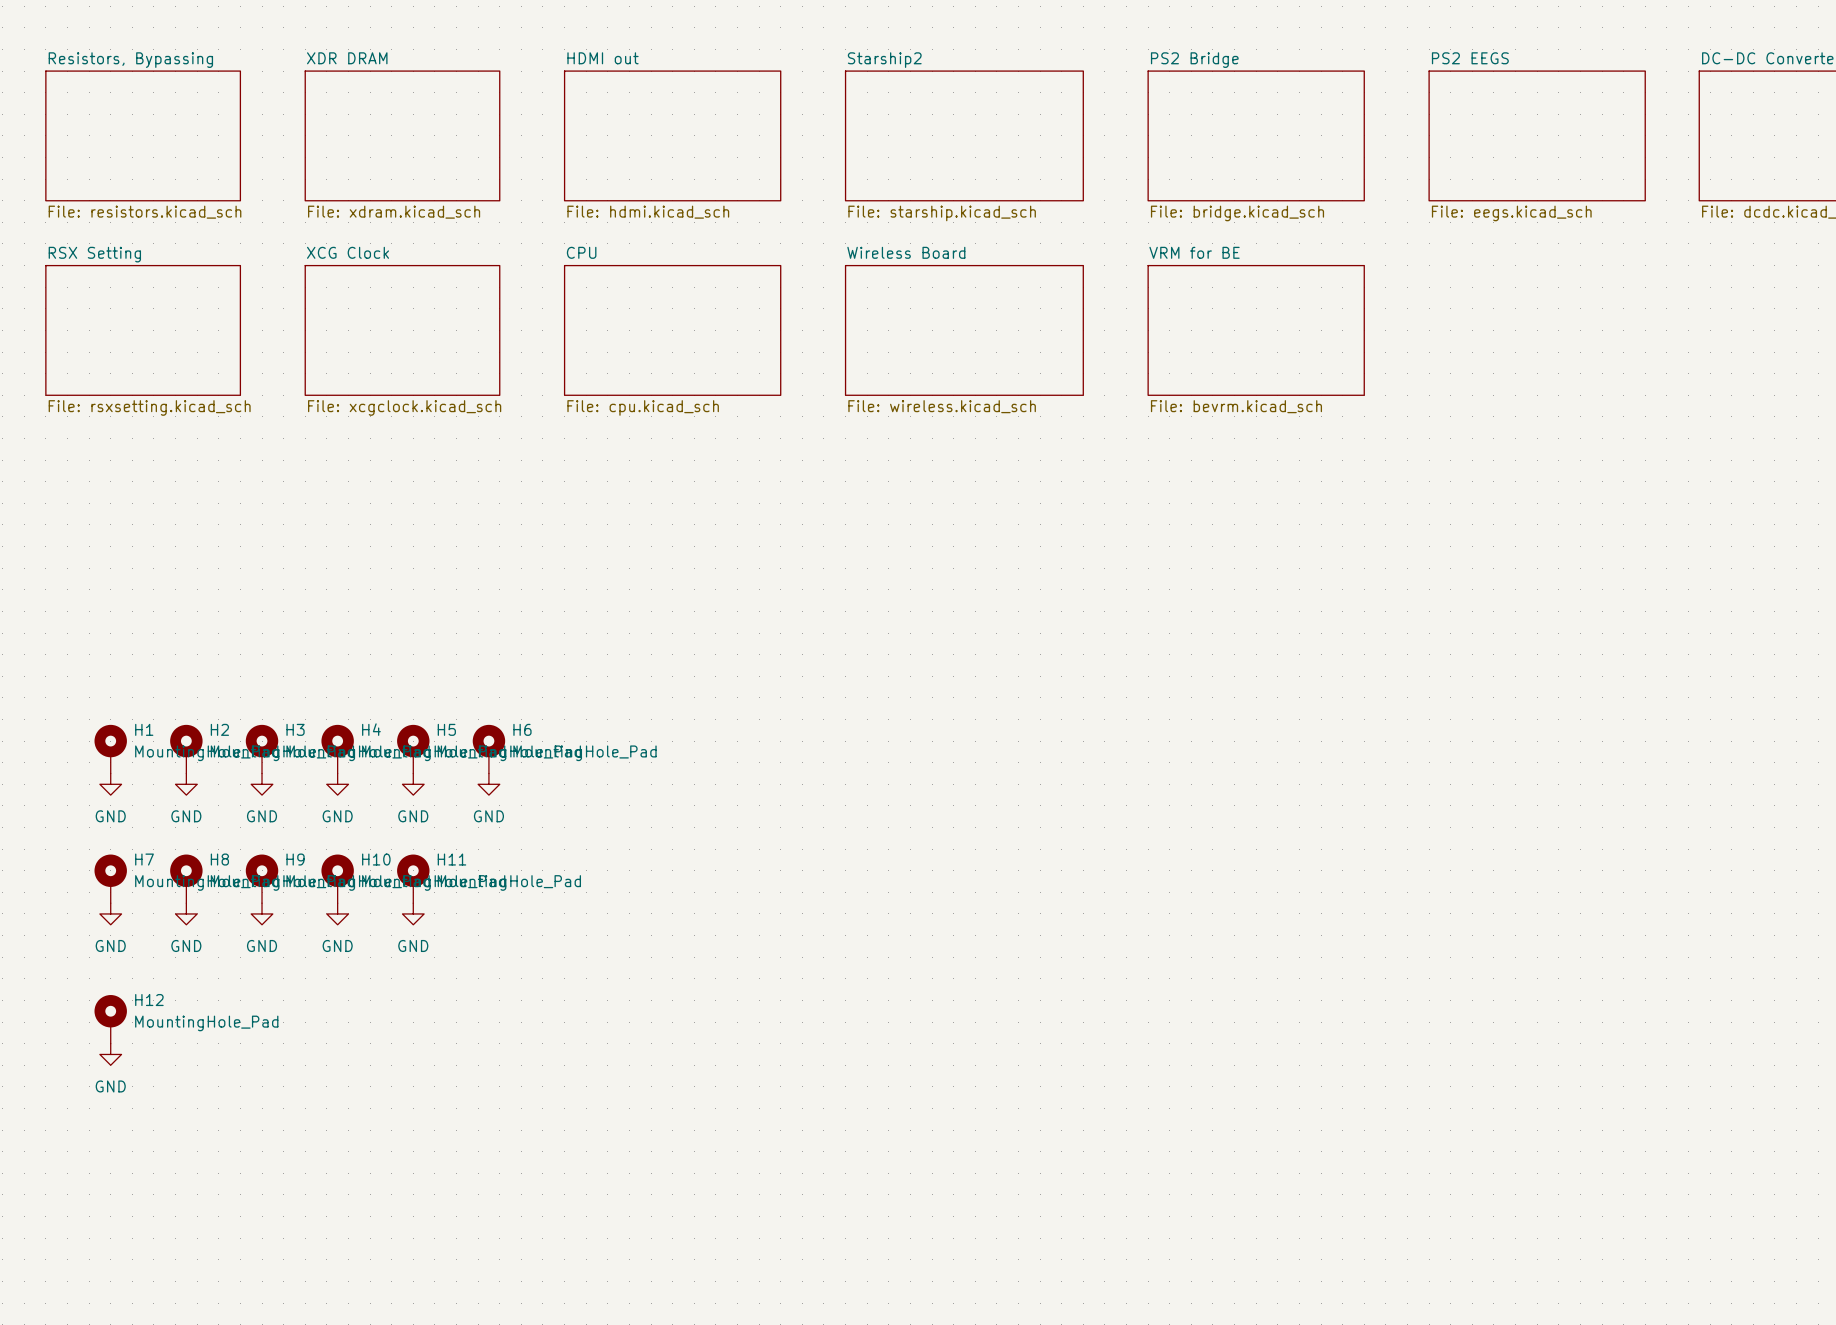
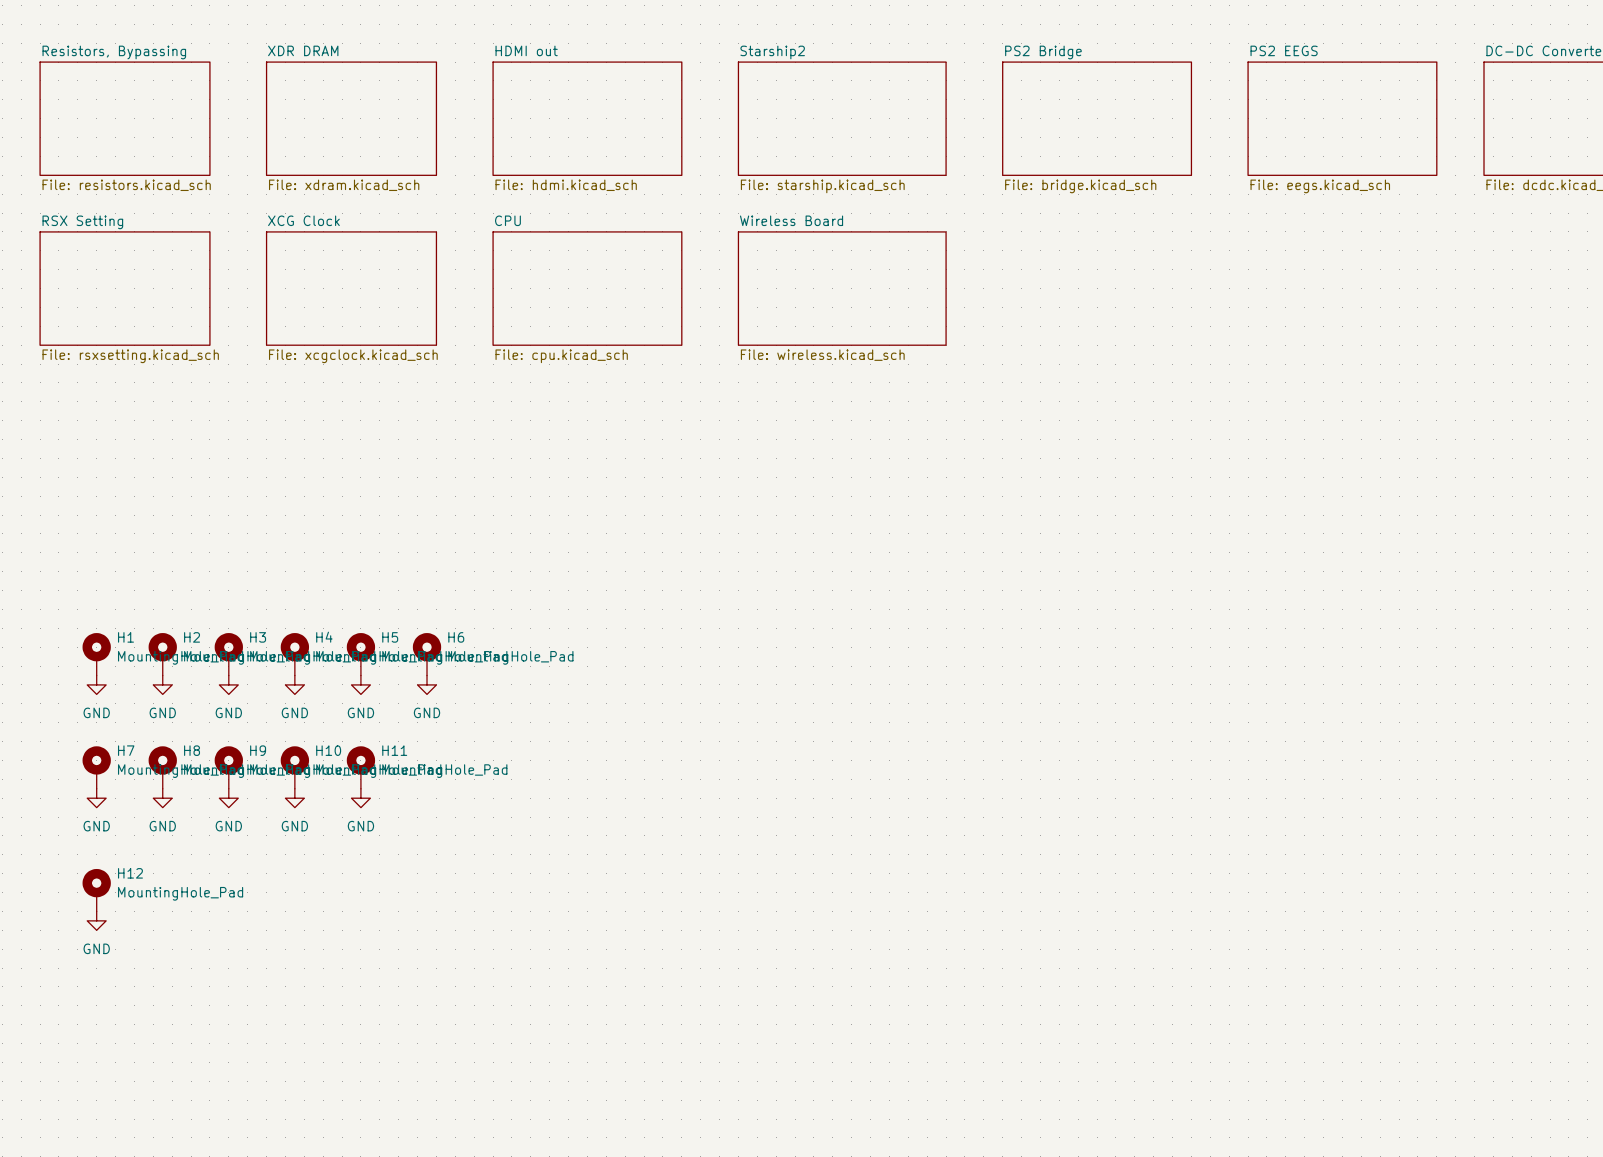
sheet VRM for BE: File: bevrm.kicad_sch (1256, 330) -> none

